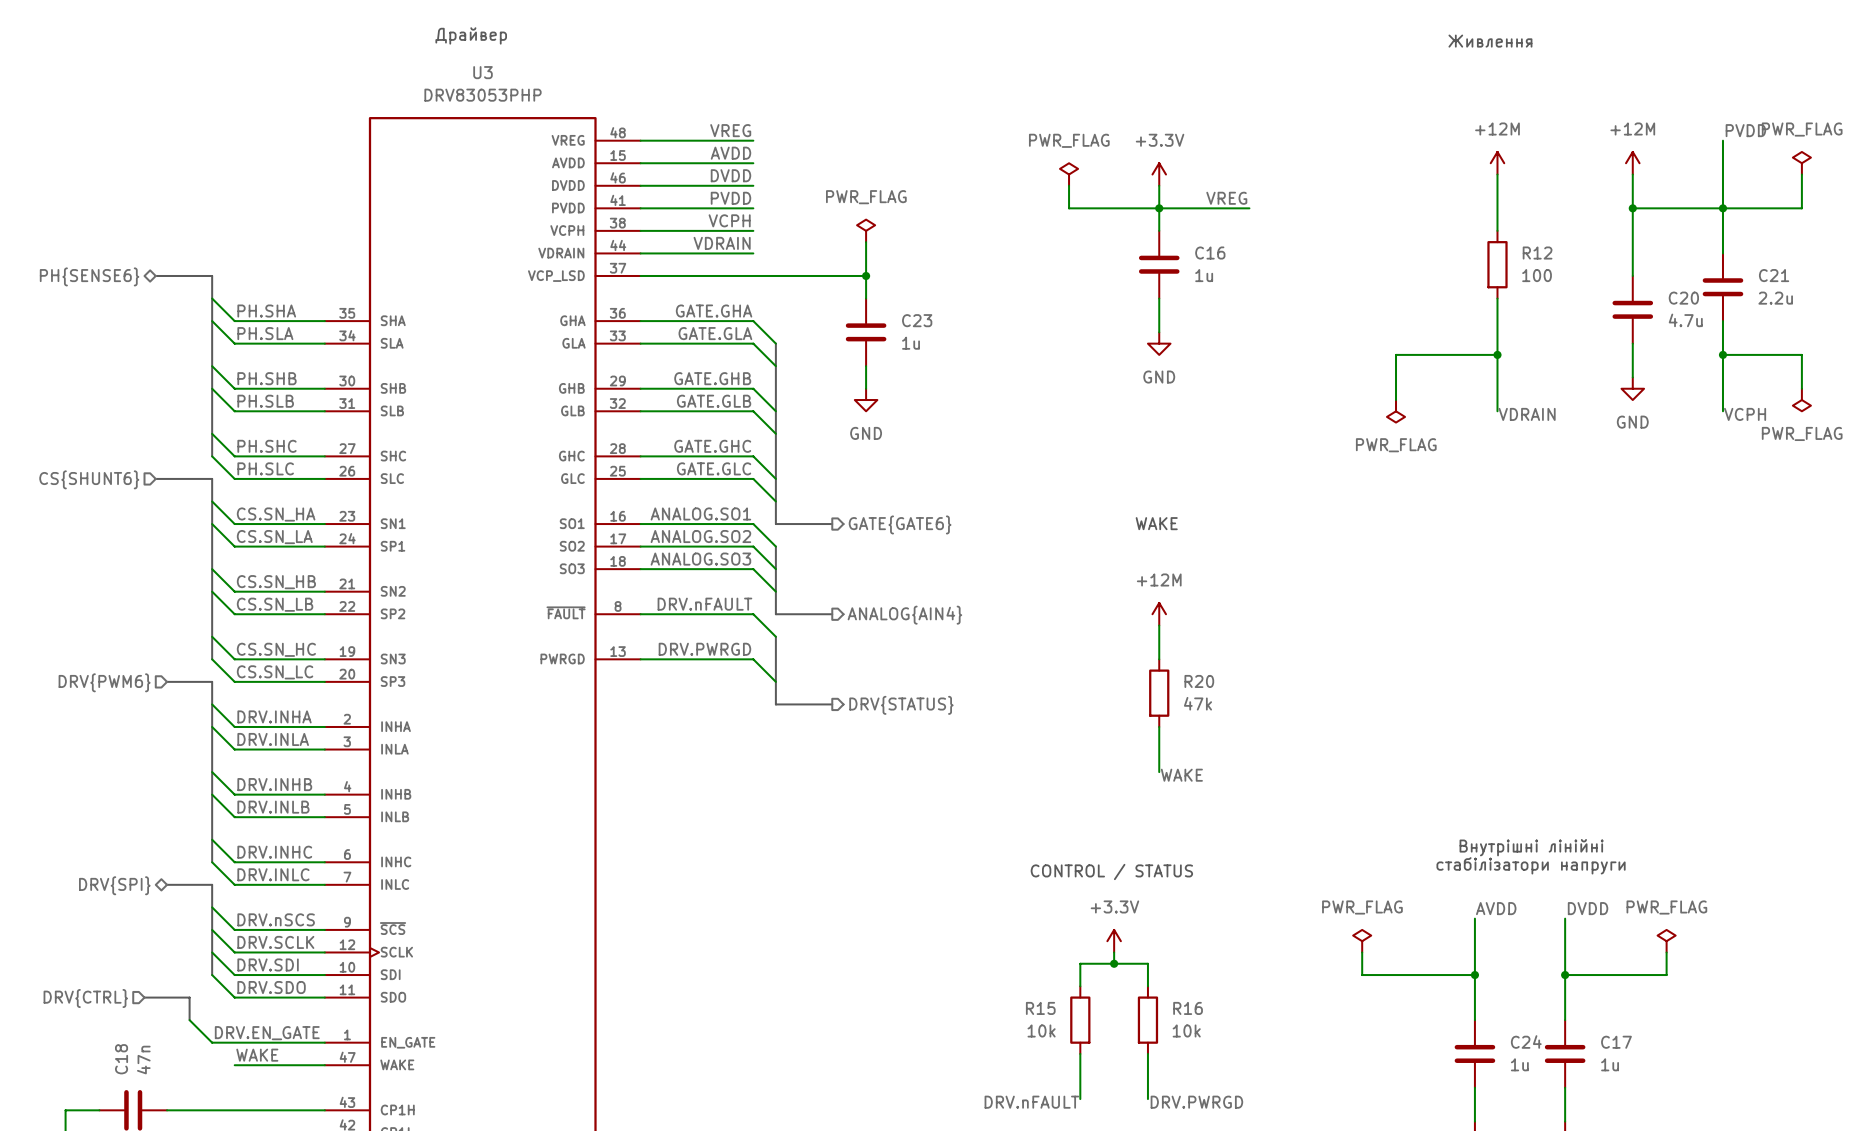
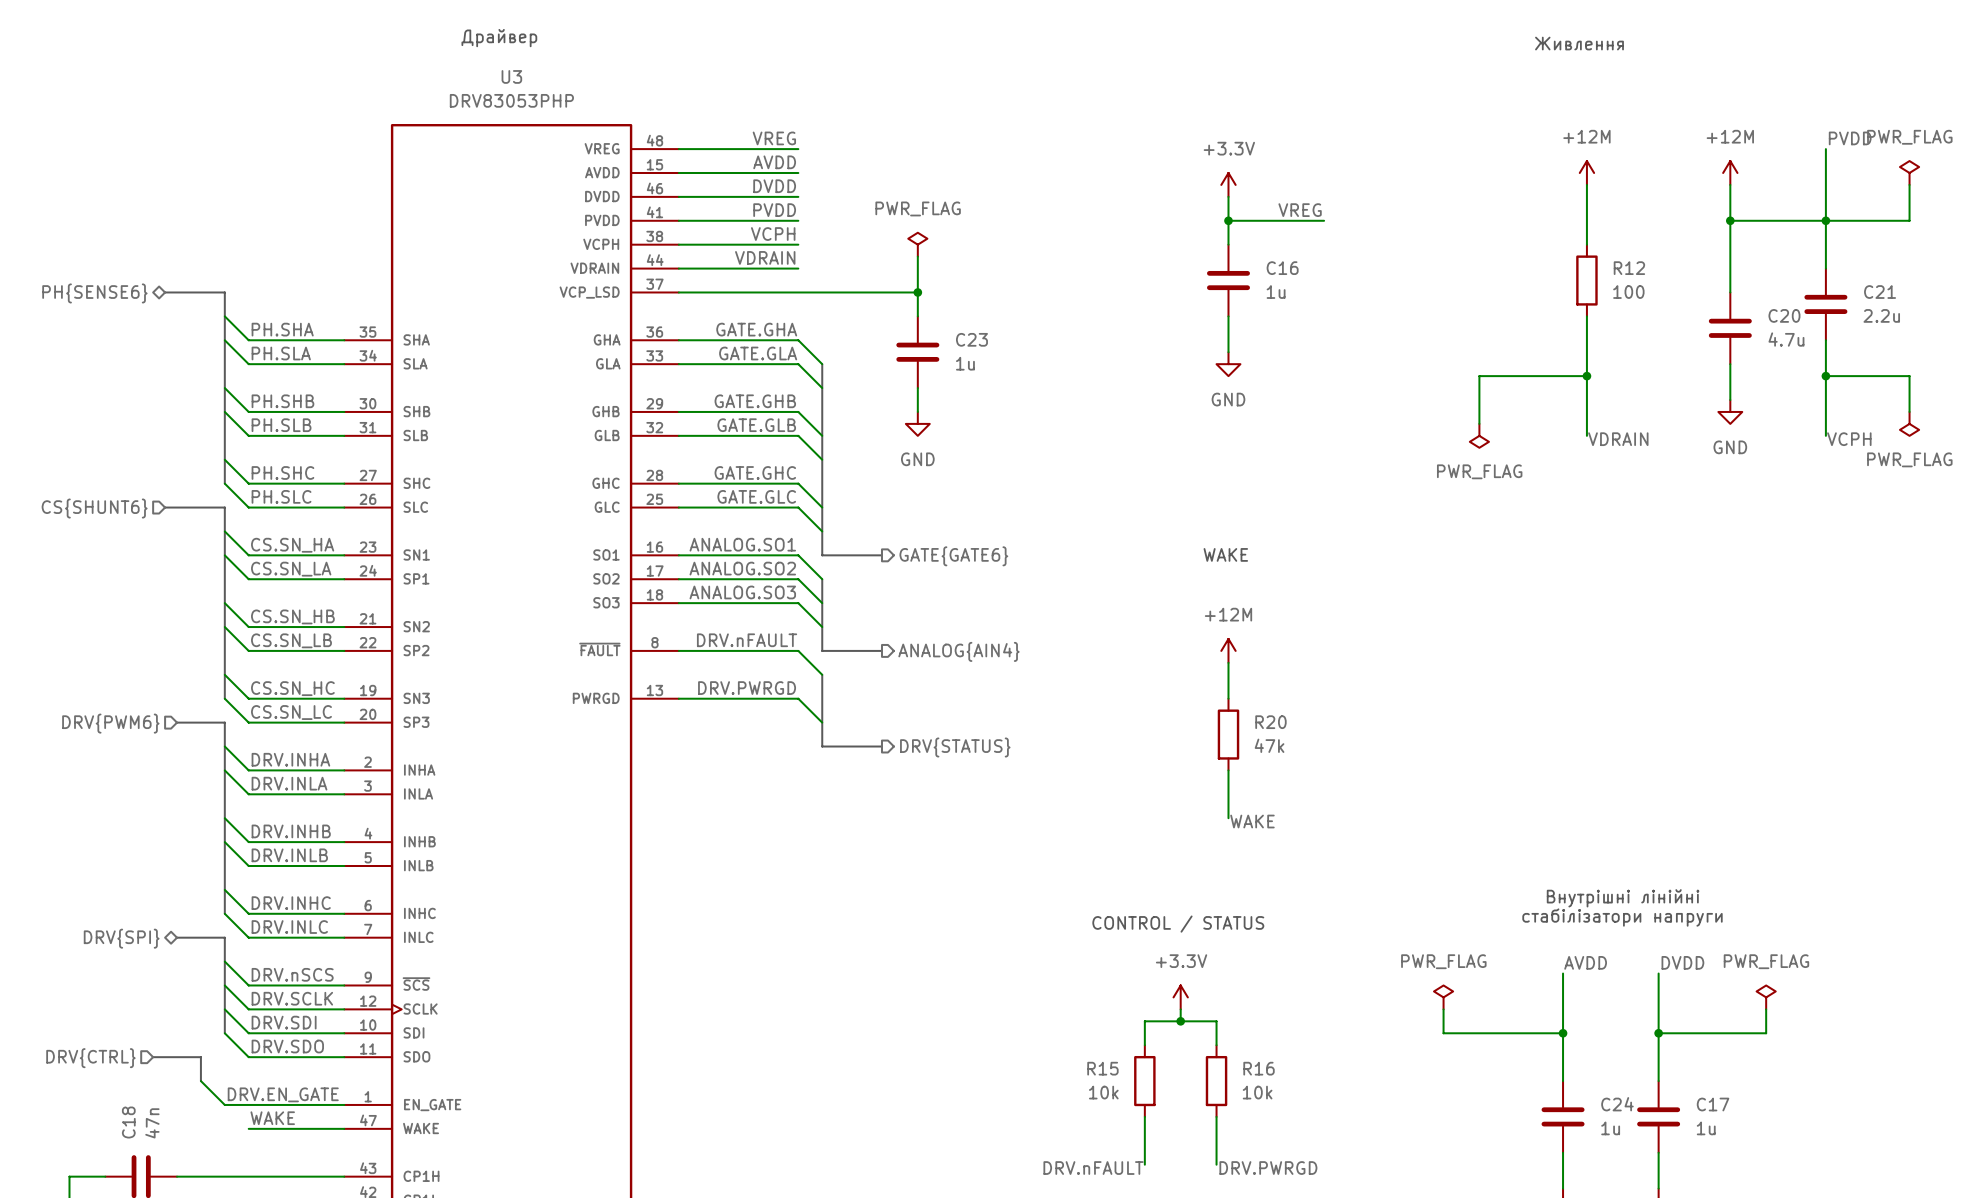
power symbol: PWR_FLAG (1069, 174) -> none
wire: (1069, 185) (1069, 208) (1159, 208) -> none

